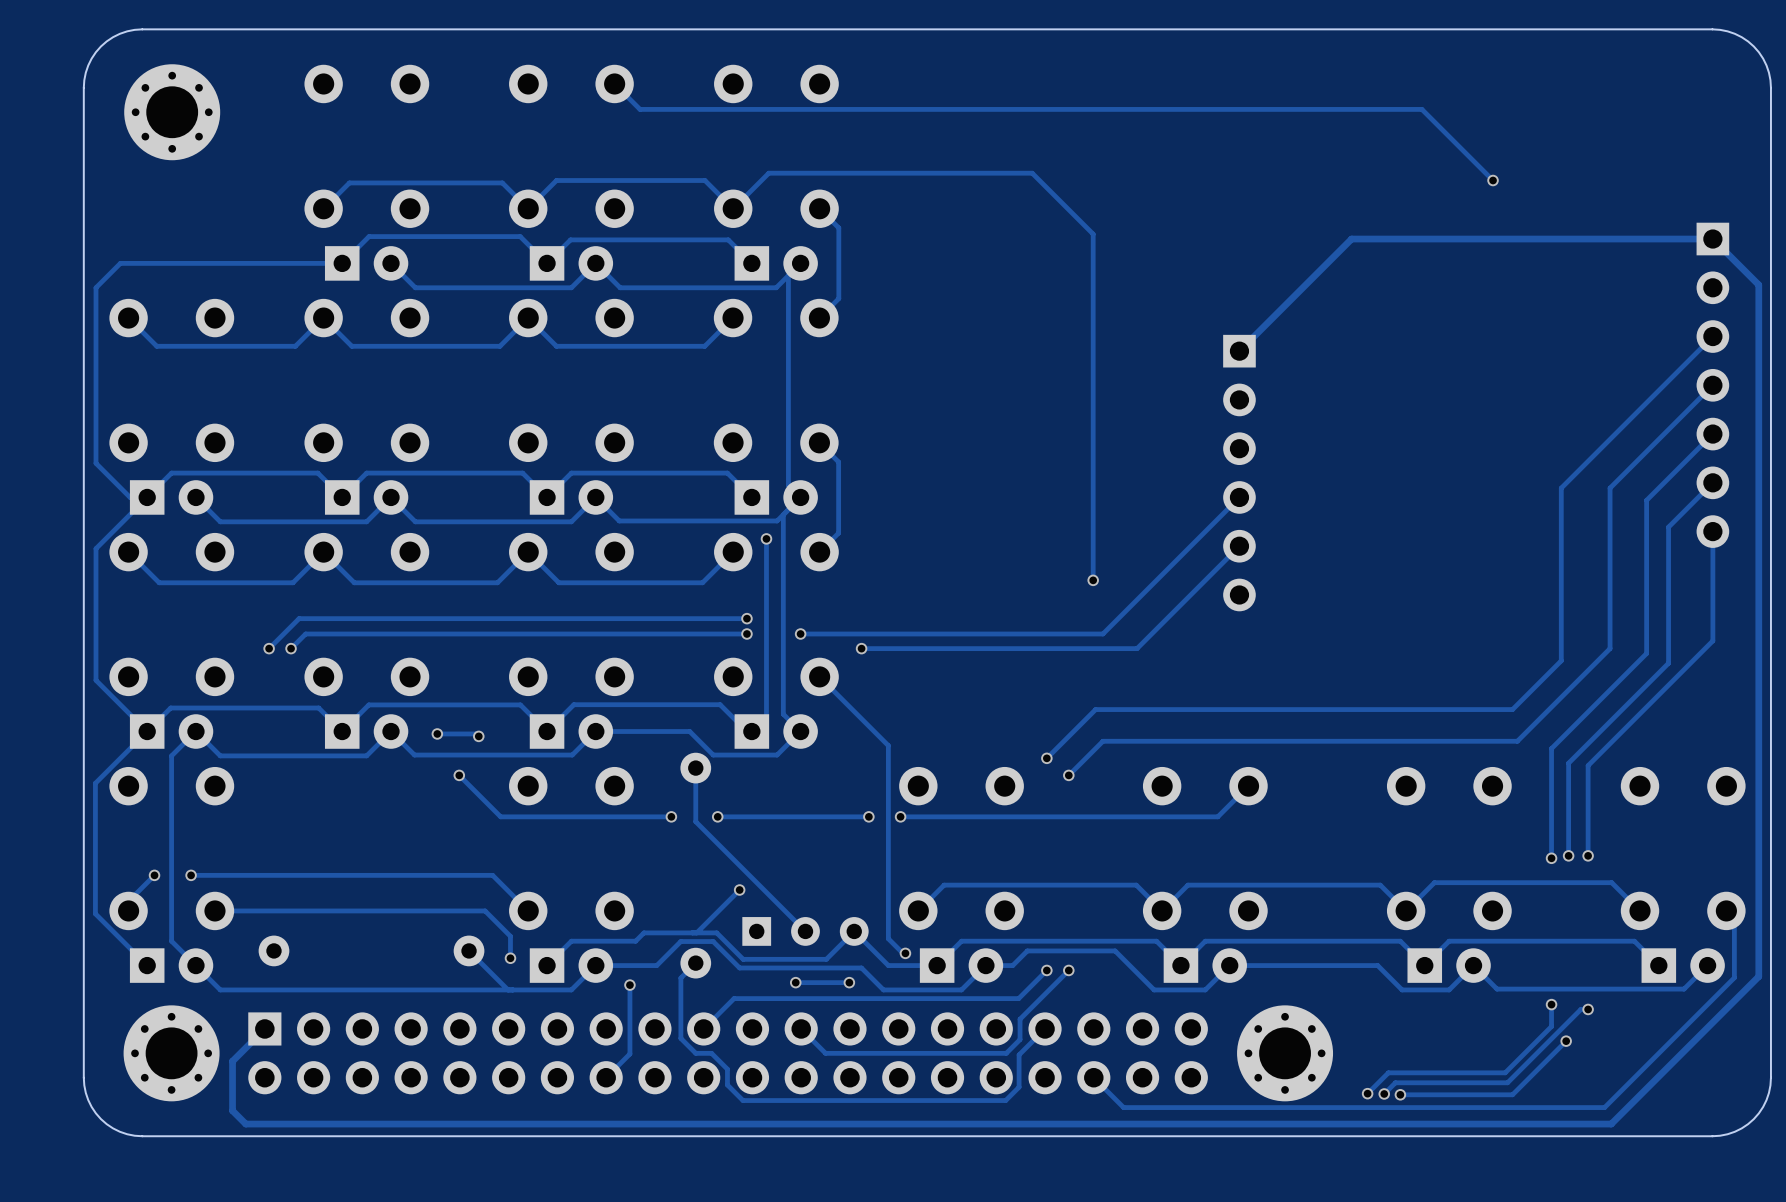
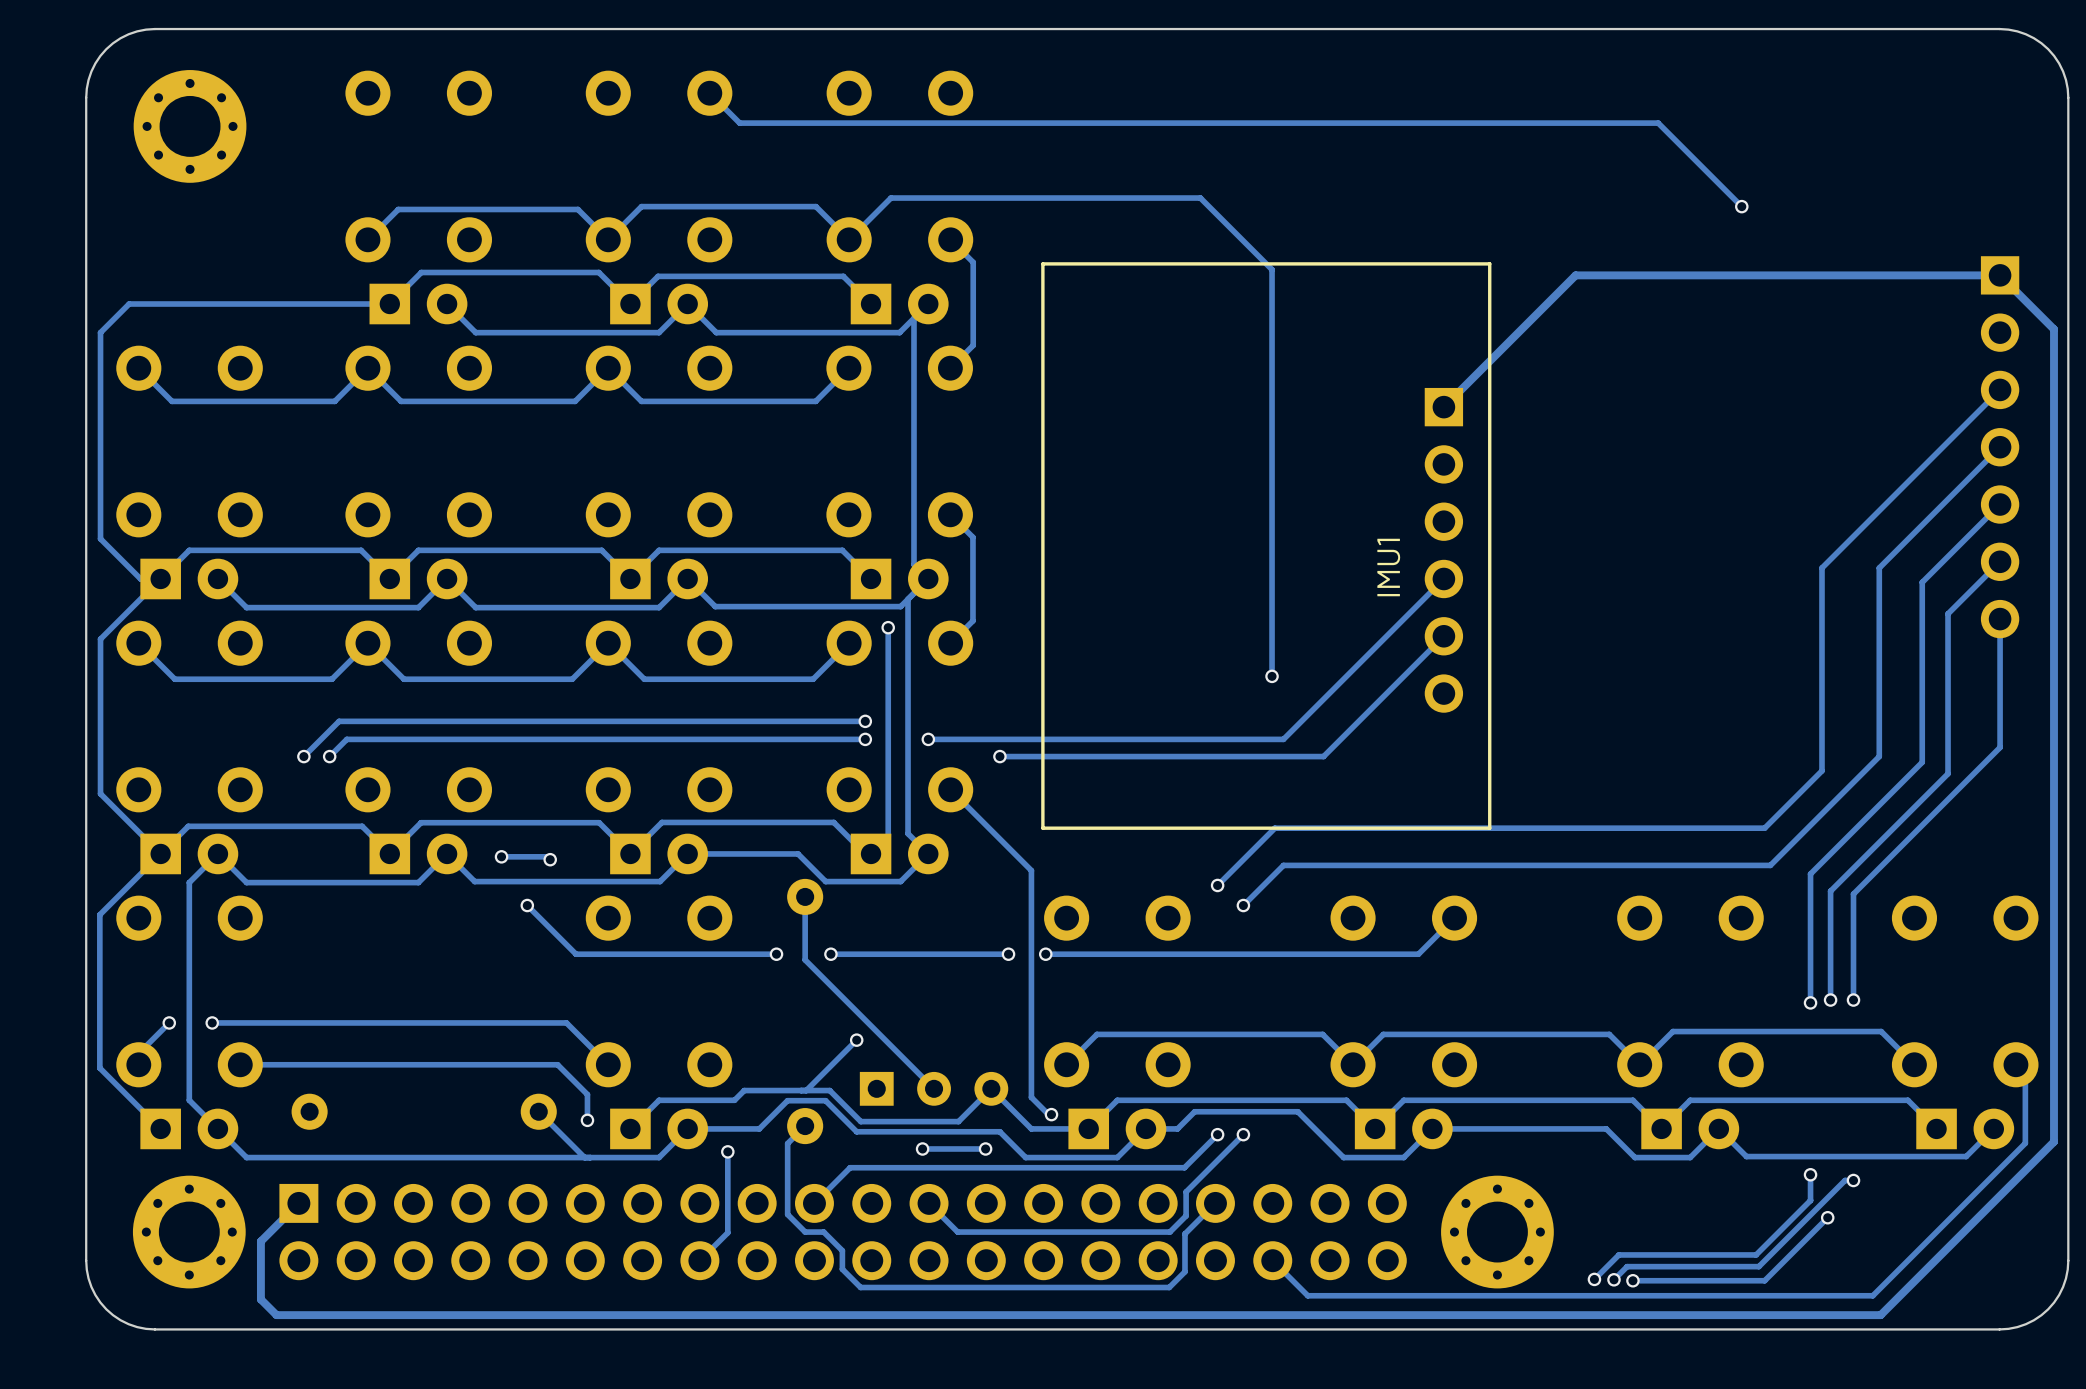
line: none -> (1489, 263) (1042, 263) (1042, 828) (1489, 828) (1489, 263)
text: none -> IMU1 (1388, 567)

